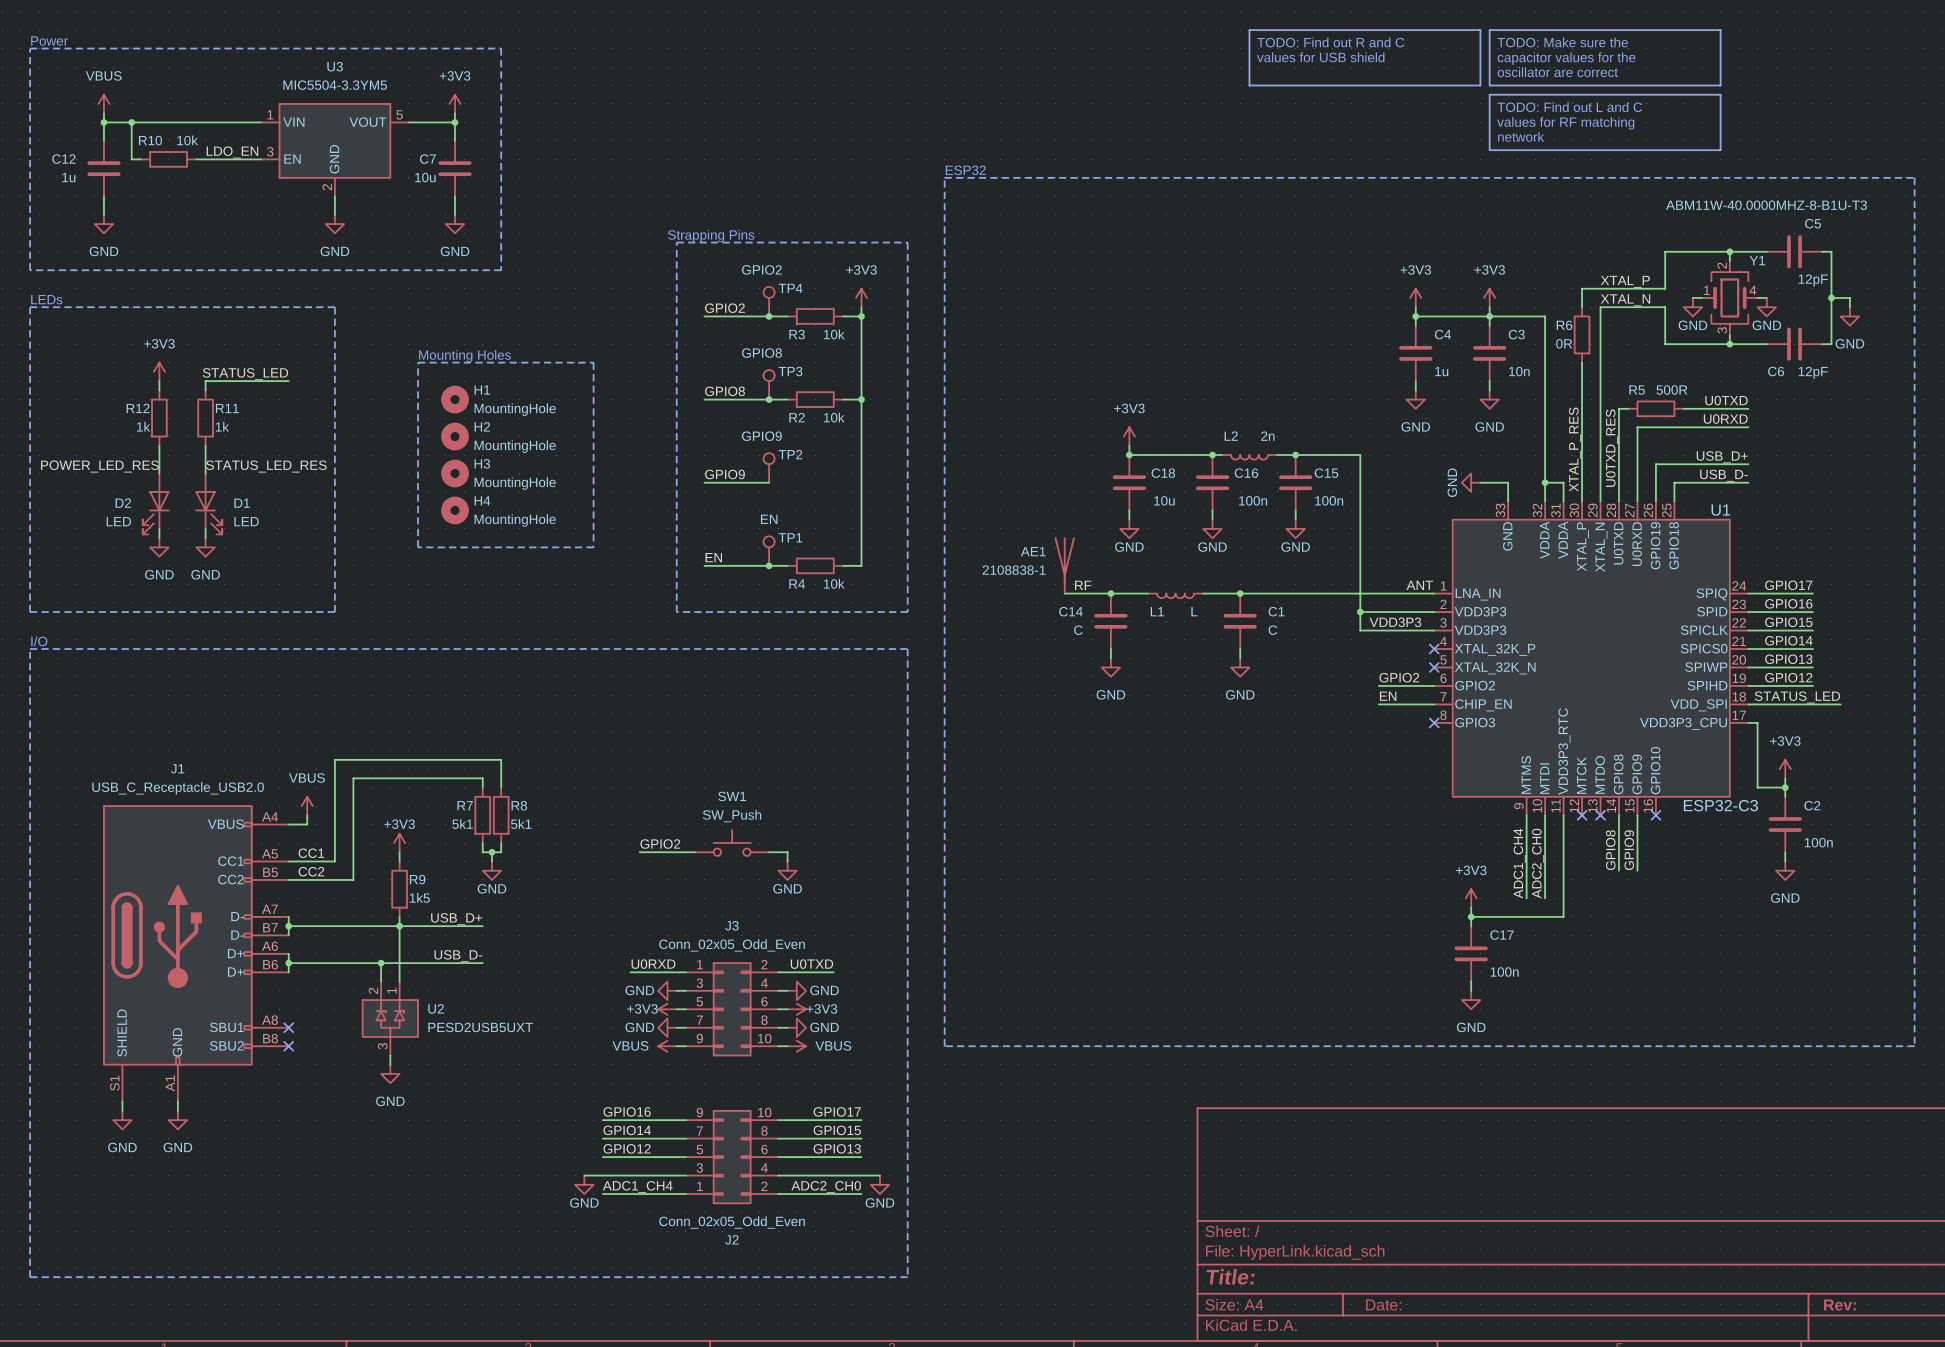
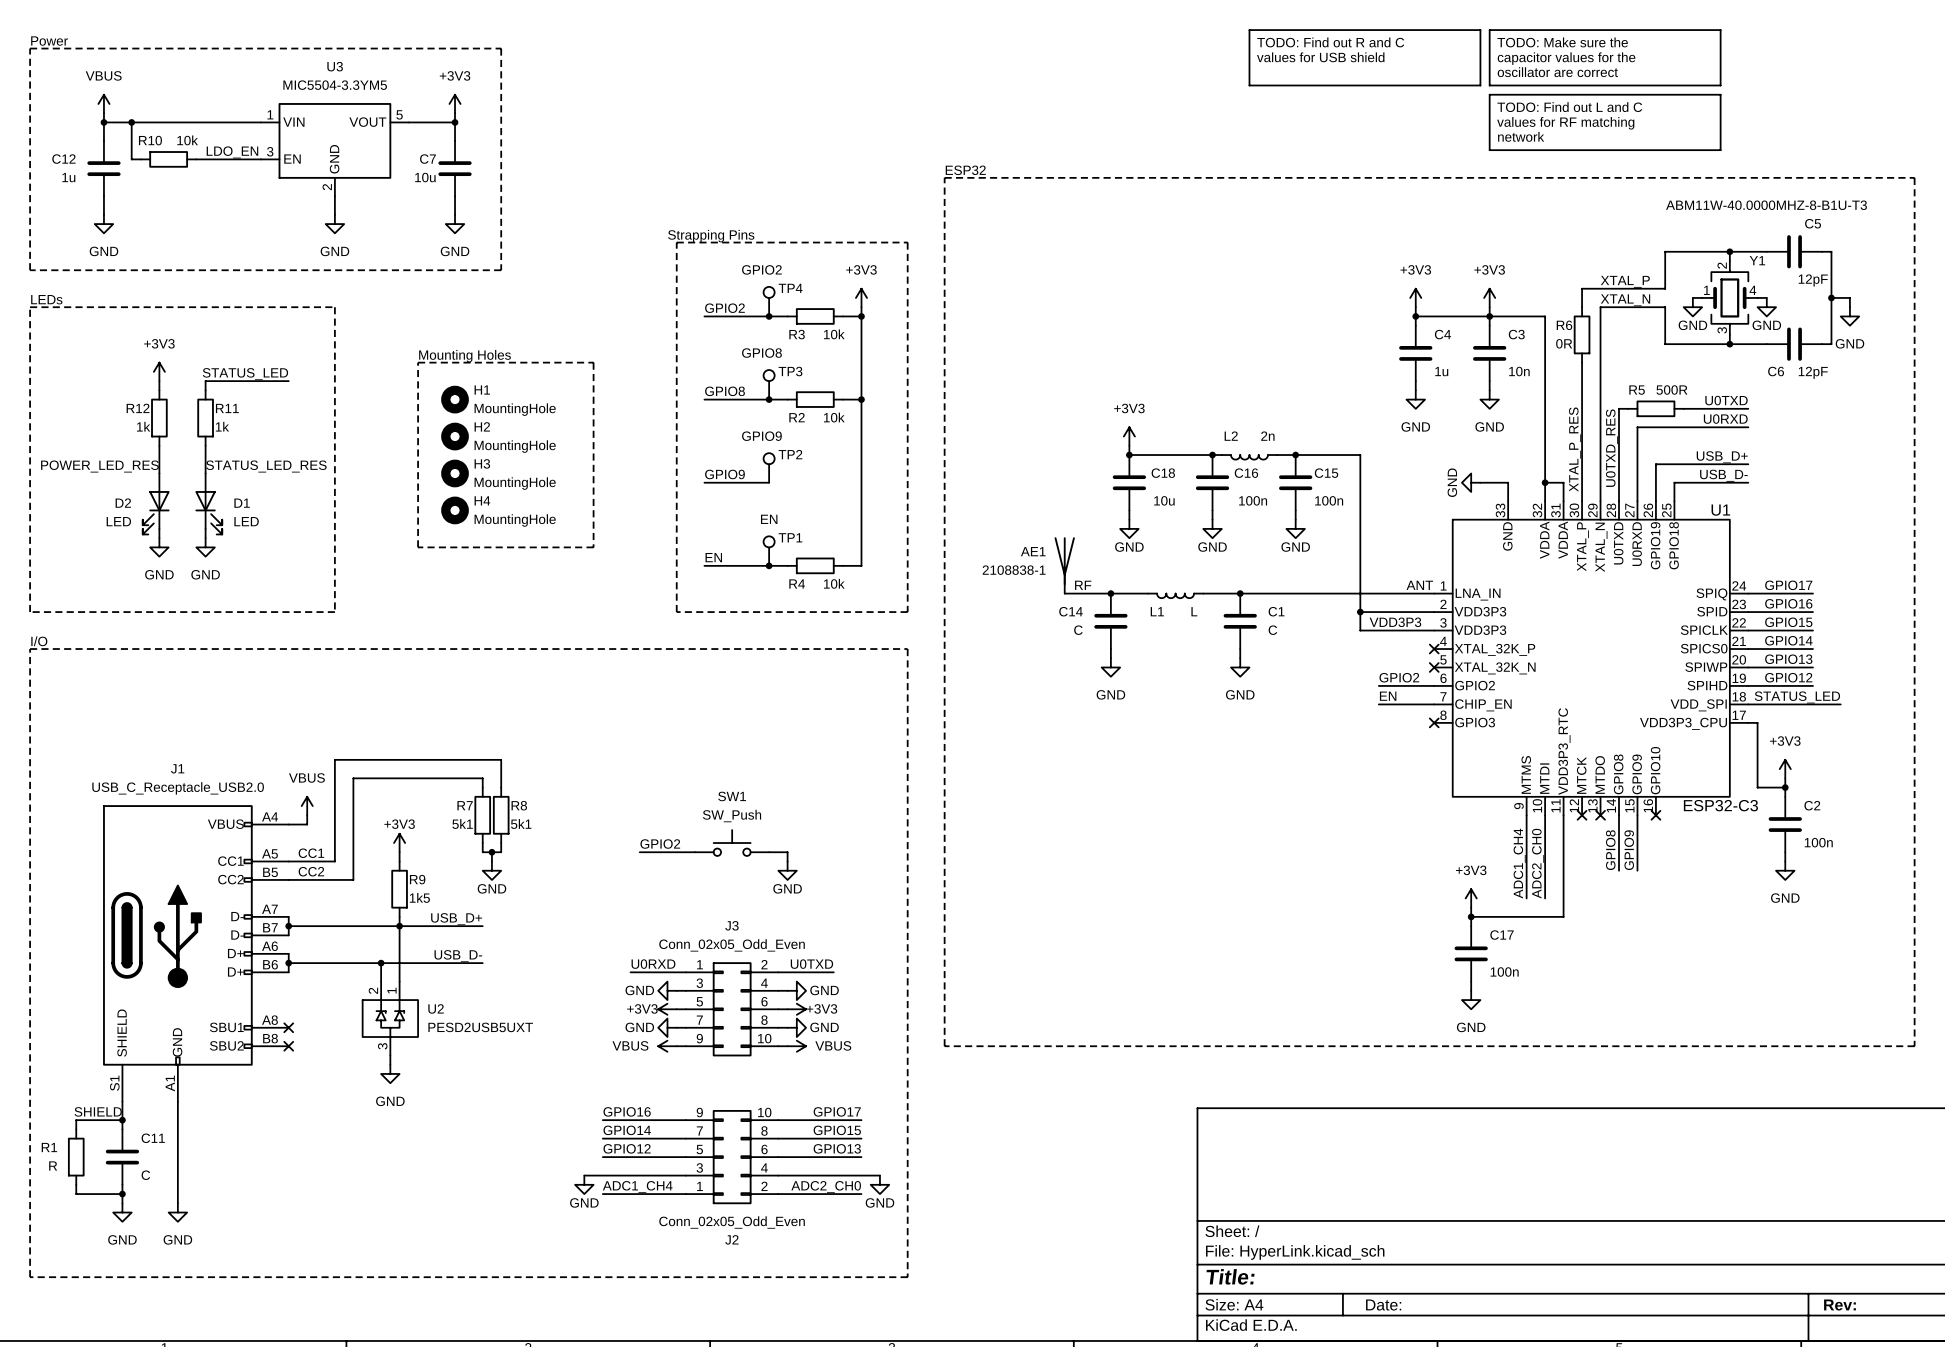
wire: none -> (177, 1110) (177, 1203)
label: none -> SHIELD (98, 1111)
wire: none -> (122, 1120) (76, 1120) (76, 1129)
power symbol: GND (122, 1120) -> none
junction: none -> (122, 1120)
power symbol: GND (177, 1120) -> none
R1: none -> R (76, 1157)
C11: none -> C (122, 1157)
wire: none -> (76, 1184) (76, 1194) (122, 1194)
wire: none -> (122, 1184) (122, 1203)
junction: none -> (122, 1194)
power symbol: none -> GND (122, 1212)
power symbol: none -> GND (177, 1212)

